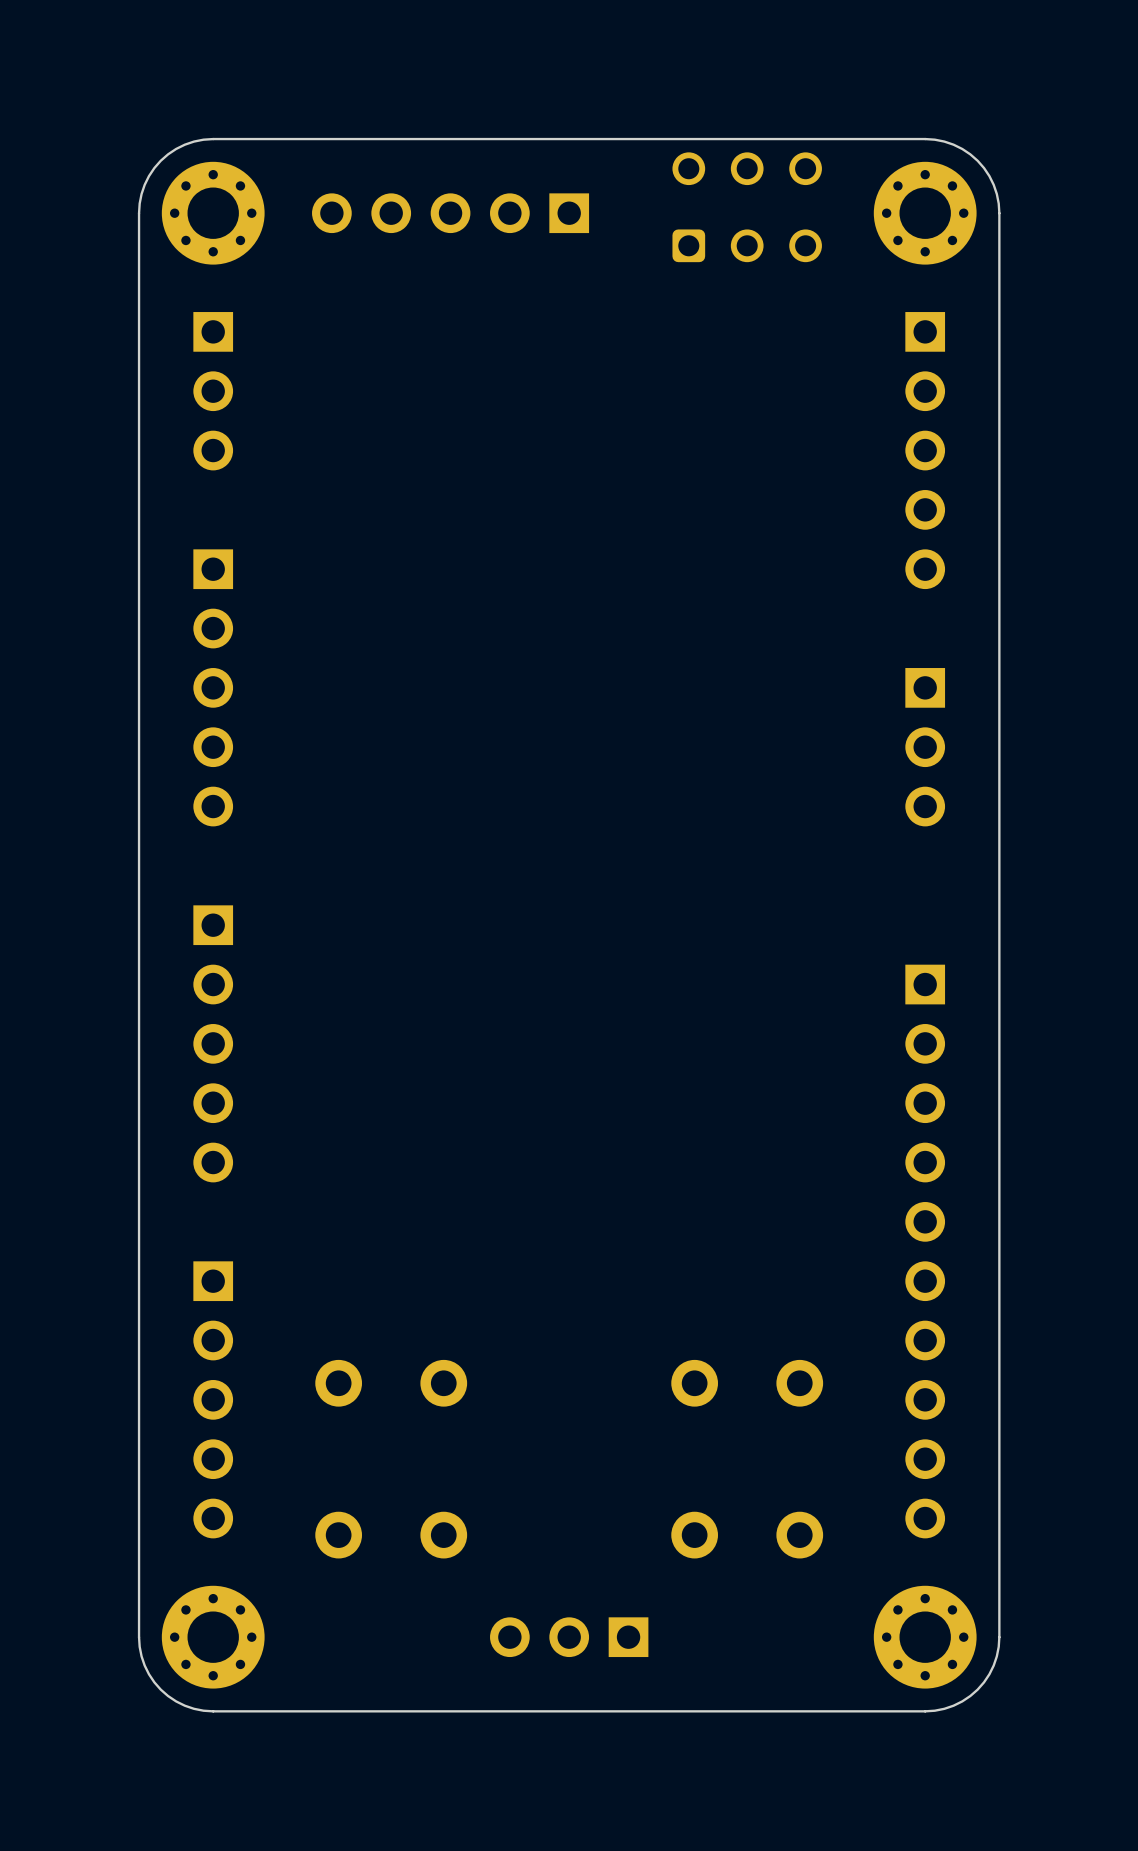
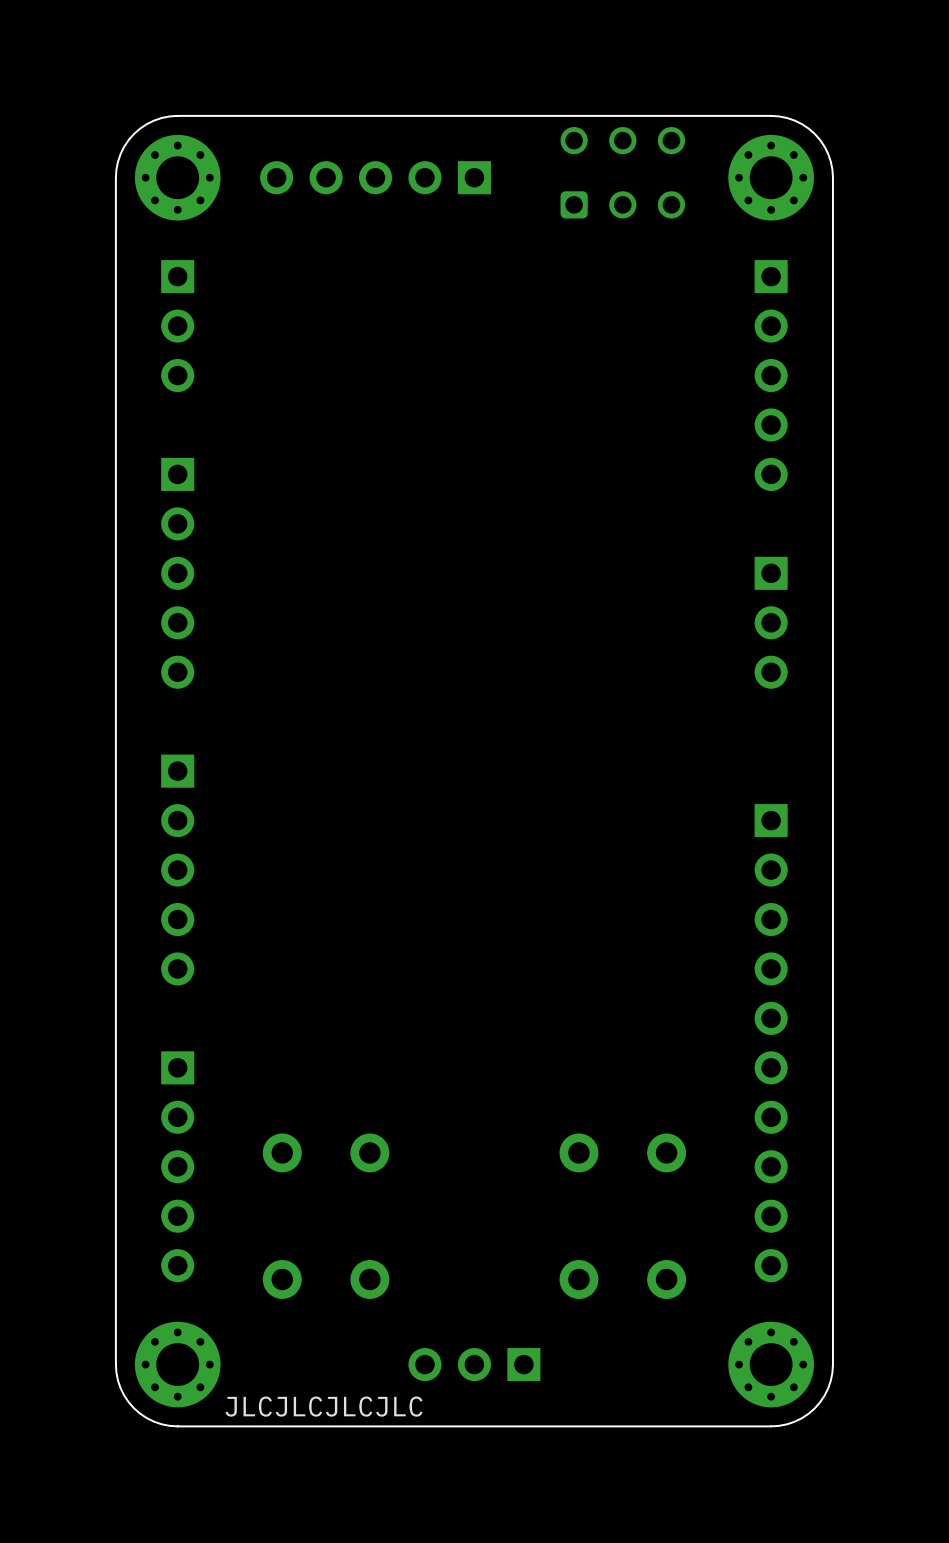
text: none -> JLCJLCJLCJLC (324, 1406)

